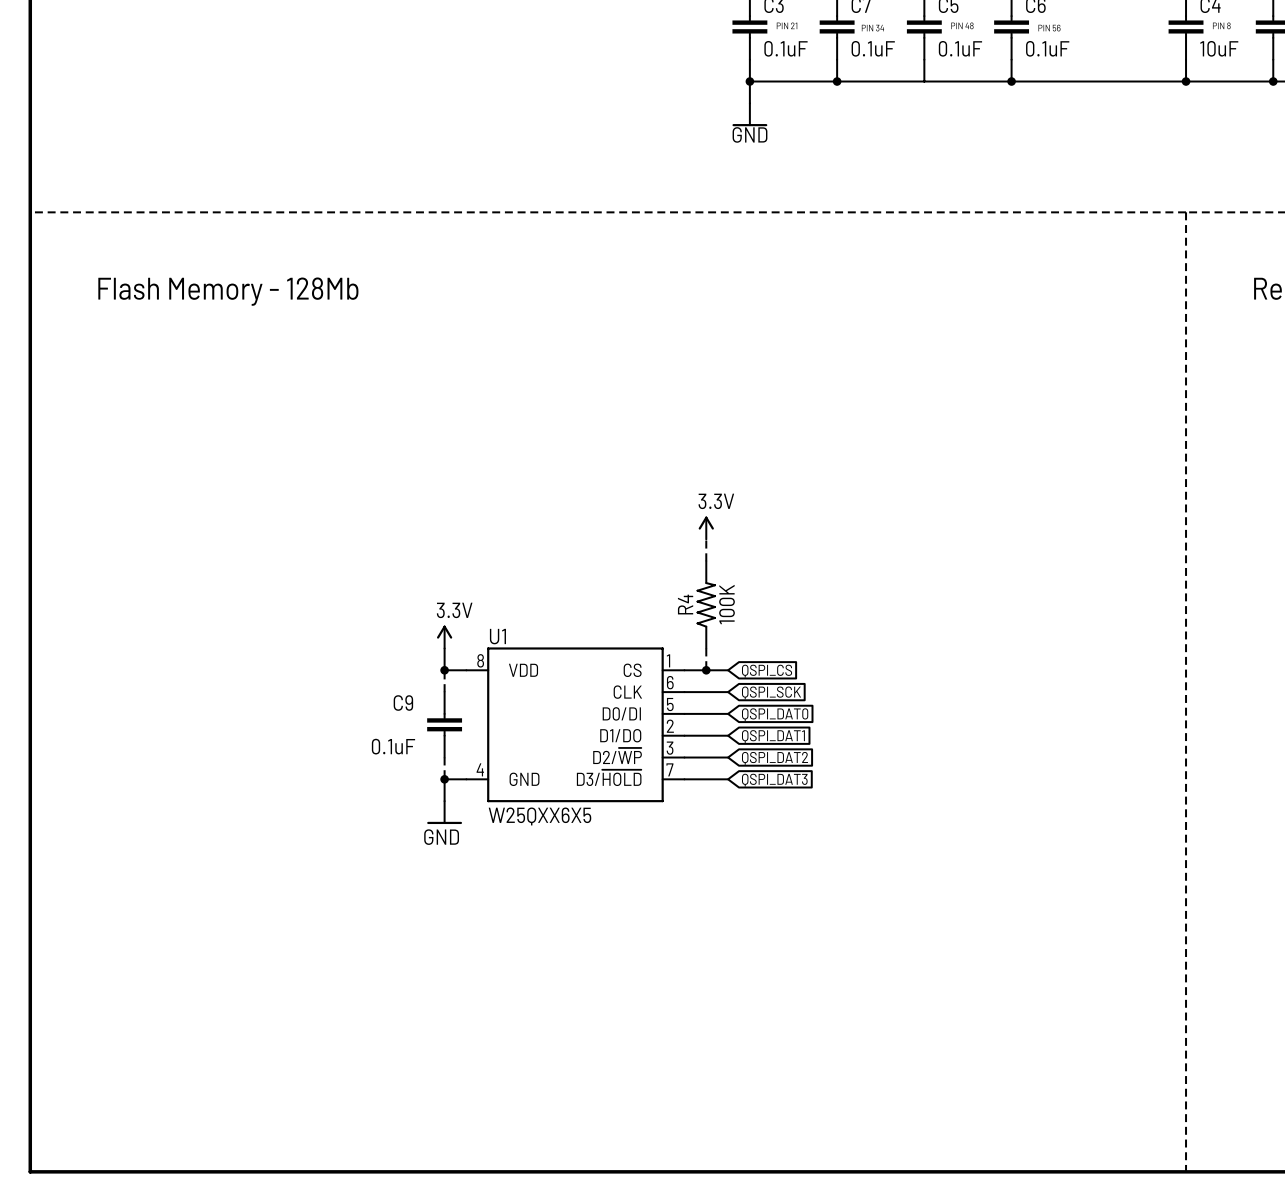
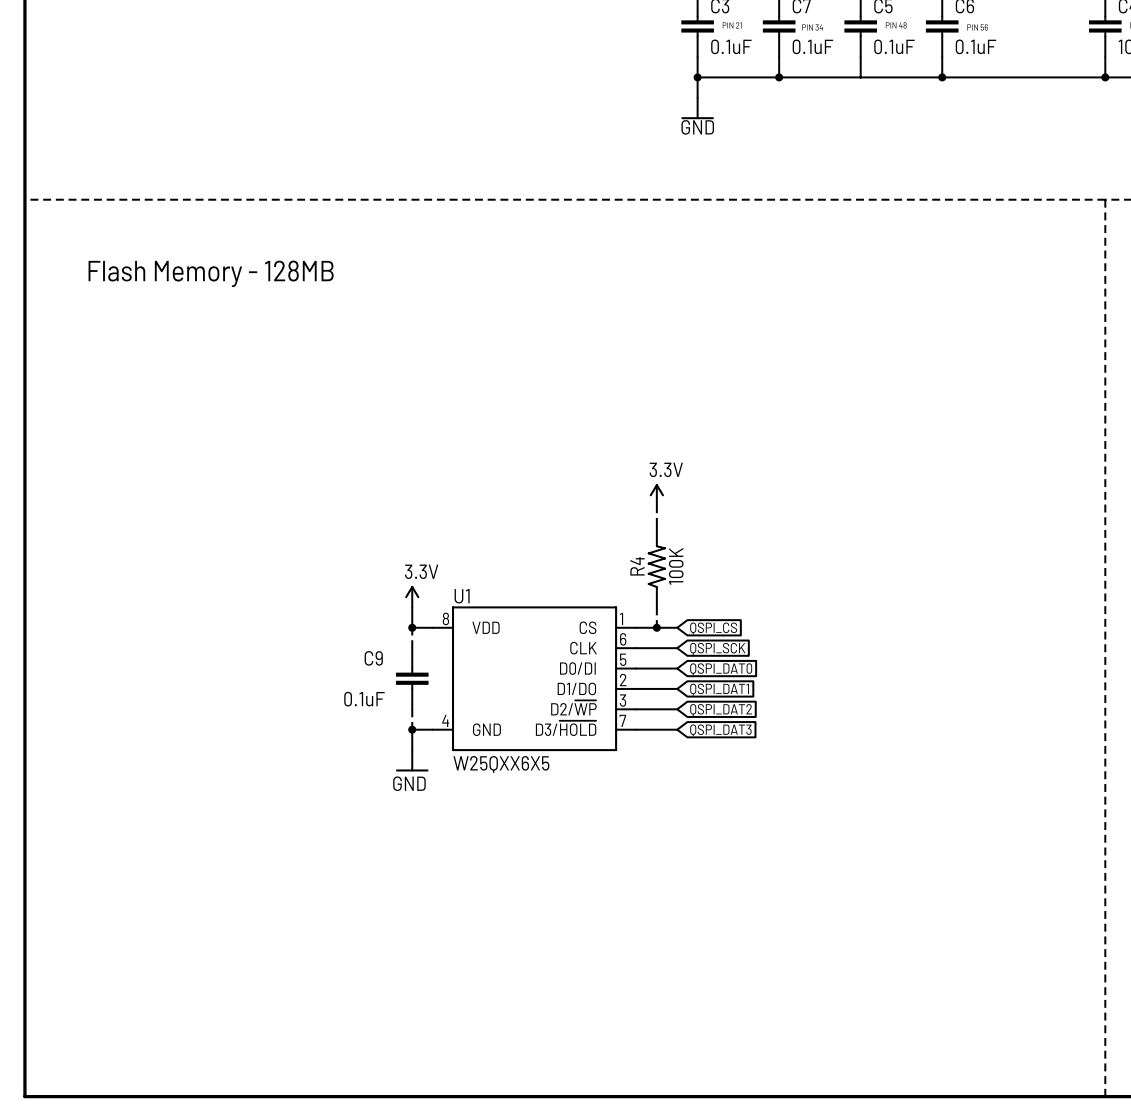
text: Flash Memory - 128Mb (228, 291) -> Flash Memory - 128MB (211, 273)

